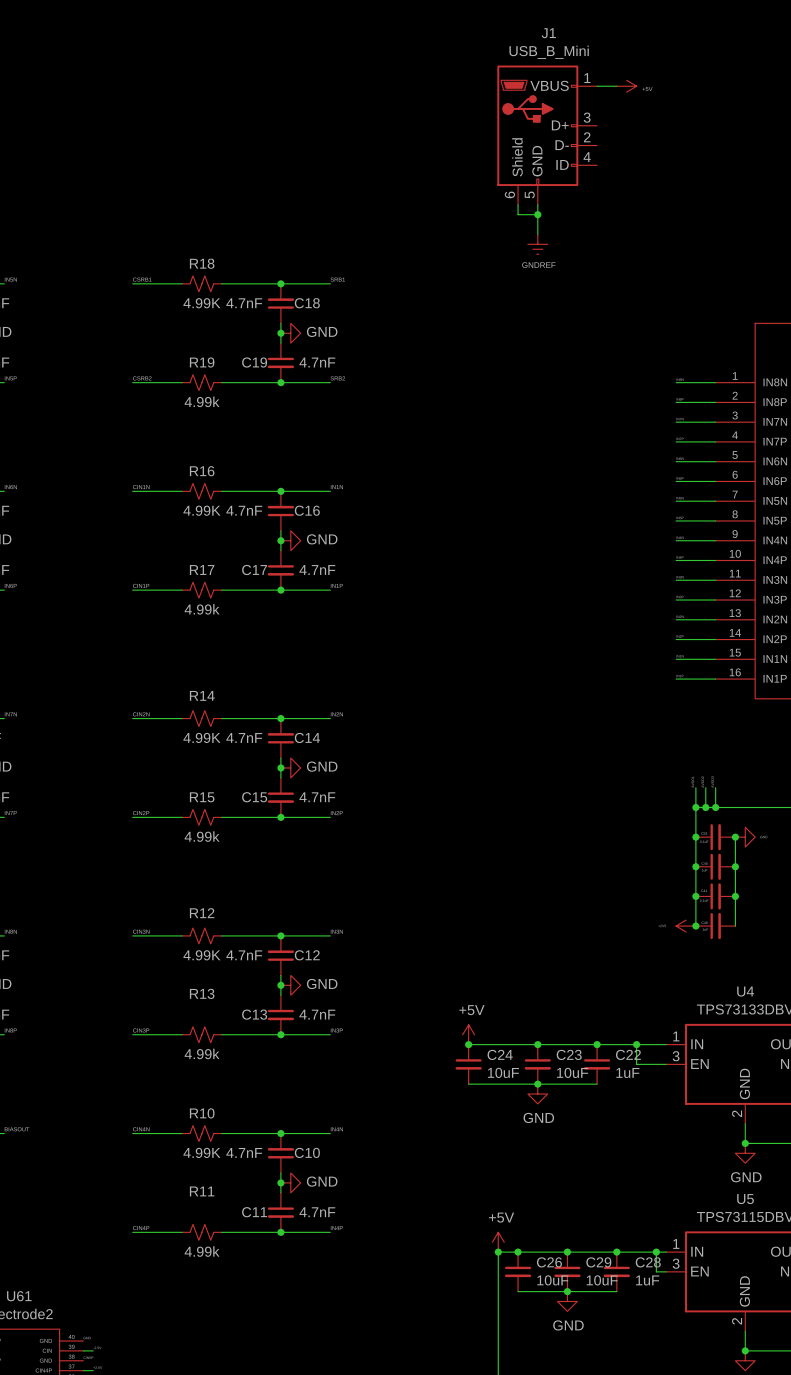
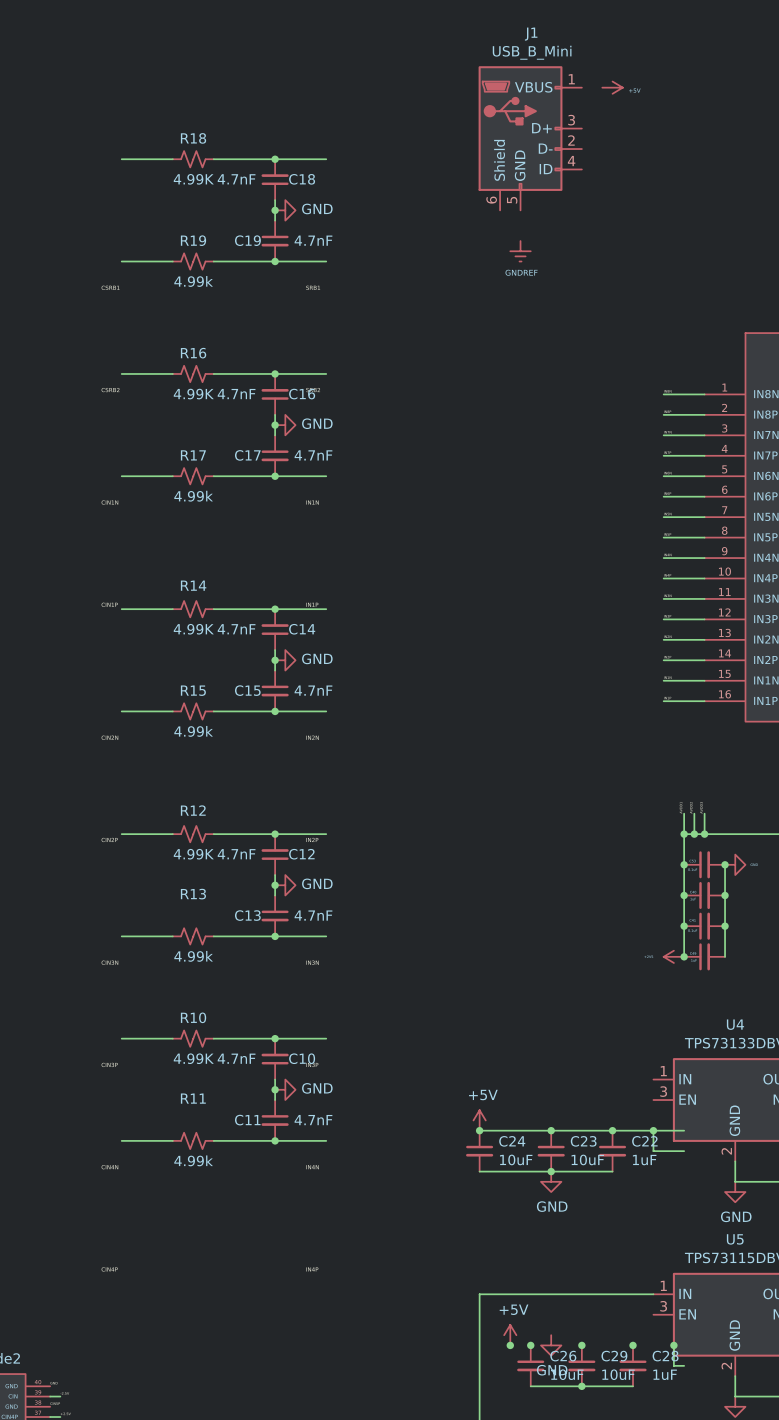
wire: (597, 86) (616, 86) -> none
junction: none -> (275, 159)
junction: none -> (275, 210)
power symbol: none -> GND (285, 210)
wire: (518, 204) (518, 214) (537, 214) -> none
wire: (537, 204) (537, 234) -> none
junction: (537, 214) -> none
wire: (132, 283) (182, 283) -> (121, 159) (172, 159)
R18 position: (201, 283) -> (193, 159)
wire: (221, 283) (330, 283) -> (213, 159) (326, 159)
junction position: (280, 283) -> (275, 261)
C18 position: (280, 303) -> (275, 179)
wire: (280, 323) (280, 343) -> (275, 200) (275, 220)
junction: (280, 333) -> none
power symbol: GND (290, 333) -> none
C19 position: (280, 362) -> (275, 241)
junction: none -> (275, 373)
wire: (132, 382) (182, 382) -> (121, 261) (172, 261)
R19 position: (201, 382) -> (193, 261)
wire: (221, 382) (330, 382) -> (213, 261) (326, 261)
junction: (280, 382) -> none
junction: none -> (275, 425)
power symbol: none -> GND (285, 425)
wire: none -> (121, 476) (172, 476)
wire: none -> (213, 476) (326, 476)
wire: (132, 491) (182, 491) -> (121, 373) (172, 373)
R16 position: (201, 491) -> (193, 373)
wire: (221, 491) (330, 491) -> (213, 373) (326, 373)
junction position: (280, 491) -> (275, 476)
C16 position: (280, 511) -> (275, 394)
wire: (280, 530) (280, 550) -> (275, 414) (275, 435)
junction: (280, 540) -> none
power symbol: GND (290, 540) -> none
C17 position: (280, 570) -> (275, 455)
wire: (132, 590) (152, 590) -> none
R17 position: (201, 590) -> (193, 476)
junction position: (280, 590) -> (275, 609)
wire: none -> (305, 609) (326, 609)
junction: none -> (275, 660)
power symbol: none -> GND (285, 660)
wire: (132, 718) (182, 718) -> none
R14 position: (201, 718) -> (193, 609)
wire: (221, 718) (330, 718) -> none
junction position: (280, 718) -> (275, 711)
C14 position: (280, 738) -> (275, 629)
wire: (280, 758) (280, 777) -> (275, 650) (275, 670)
junction: (280, 767) -> none
power symbol: GND (290, 767) -> none
C15 position: (280, 797) -> (275, 690)
junction: none -> (275, 834)
wire: (132, 817) (182, 817) -> (121, 711) (172, 711)
R15 position: (201, 817) -> (193, 711)
wire: (221, 817) (330, 817) -> (213, 711) (326, 711)
junction: (280, 817) -> none
junction: none -> (275, 885)
power symbol: none -> GND (285, 885)
wire: (132, 935) (182, 935) -> (121, 834) (172, 834)
R12 position: (201, 935) -> (193, 834)
wire: (221, 935) (330, 935) -> (213, 834) (326, 834)
junction position: (280, 935) -> (275, 936)
C12 position: (280, 955) -> (275, 854)
wire: (280, 975) (280, 995) -> (275, 875) (275, 895)
junction: (280, 985) -> none
power symbol: GND (290, 985) -> none
junction: none -> (275, 1038)
C13 position: (280, 1014) -> (275, 915)
wire: (132, 1034) (182, 1034) -> (121, 936) (172, 936)
R13 position: (201, 1034) -> (193, 936)
wire: (221, 1034) (330, 1034) -> (213, 936) (326, 936)
junction: (280, 1034) -> none
power symbol position: +5V (468, 1034) -> +5V (479, 1120)
wire: (468, 1044) (666, 1044) -> (479, 1130) (684, 1130)
junction: (468, 1044) -> none
junction: (537, 1044) -> none
junction: (597, 1044) -> none
wire: (636, 1044) (636, 1064) (666, 1064) -> (653, 1130) (653, 1151) (684, 1151)
junction: (636, 1044) -> none
junction: none -> (275, 1089)
power symbol: none -> GND (285, 1089)
C24 position: (468, 1064) -> (479, 1151)
C23 position: (537, 1064) -> (551, 1151)
C22 position: (597, 1064) -> (612, 1151)
wire: (468, 1084) (597, 1084) -> (479, 1171) (612, 1171)
junction: (537, 1084) -> none
junction: none -> (479, 1130)
power symbol position: GND (537, 1094) -> GND (551, 1181)
junction: none -> (551, 1130)
junction: none -> (612, 1130)
junction: none -> (653, 1130)
wire: (132, 1133) (182, 1133) -> (121, 1038) (172, 1038)
R10 position: (201, 1133) -> (193, 1038)
wire: (221, 1133) (330, 1133) -> (213, 1038) (326, 1038)
junction position: (280, 1133) -> (275, 1140)
junction: none -> (551, 1171)
junction: (745, 1143) -> none
C10 position: (280, 1153) -> (275, 1059)
wire: (280, 1173) (280, 1192) -> (275, 1079) (275, 1100)
junction: (280, 1182) -> none
power symbol: GND (290, 1182) -> none
C11 position: (280, 1212) -> (275, 1120)
wire: (132, 1232) (182, 1232) -> (121, 1140) (172, 1140)
R11 position: (201, 1232) -> (193, 1140)
wire: (221, 1232) (330, 1232) -> (213, 1140) (326, 1140)
junction: (280, 1232) -> none
power symbol position: +5V (498, 1242) -> +5V (510, 1335)
junction: (498, 1252) -> none
junction: (518, 1252) -> none
junction: (567, 1252) -> none
junction: (616, 1252) -> none
wire: (656, 1252) (656, 1271) (666, 1271) -> (673, 1345) (673, 1365) (684, 1365)
junction: (656, 1252) -> none
C26 position: (518, 1271) -> (530, 1365)
C29 position: (567, 1271) -> (581, 1365)
C28 position: (616, 1271) -> (633, 1365)
wire: (518, 1291) (616, 1291) -> (530, 1386) (633, 1386)
junction: (567, 1291) -> none
junction: none -> (510, 1345)
junction: none -> (530, 1345)
junction: none -> (581, 1345)
junction: none -> (633, 1345)
junction: none -> (673, 1345)
junction: none -> (581, 1386)
junction: (745, 1350) -> none

